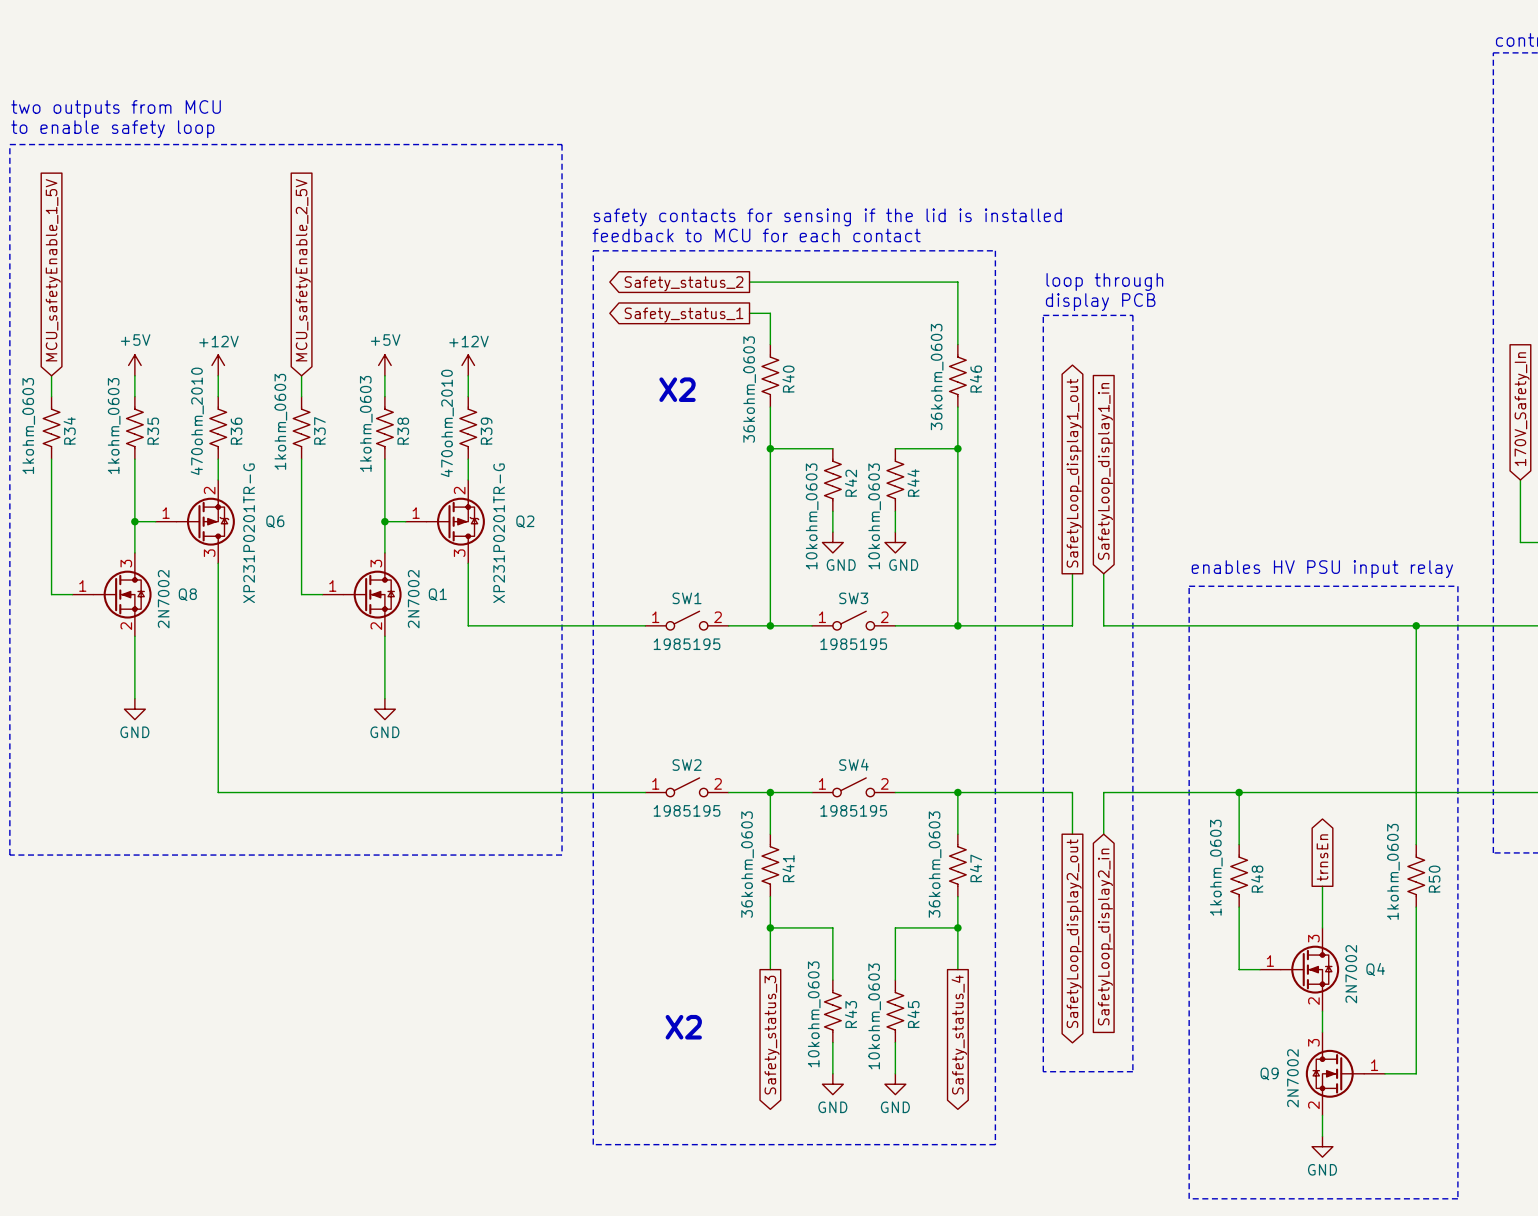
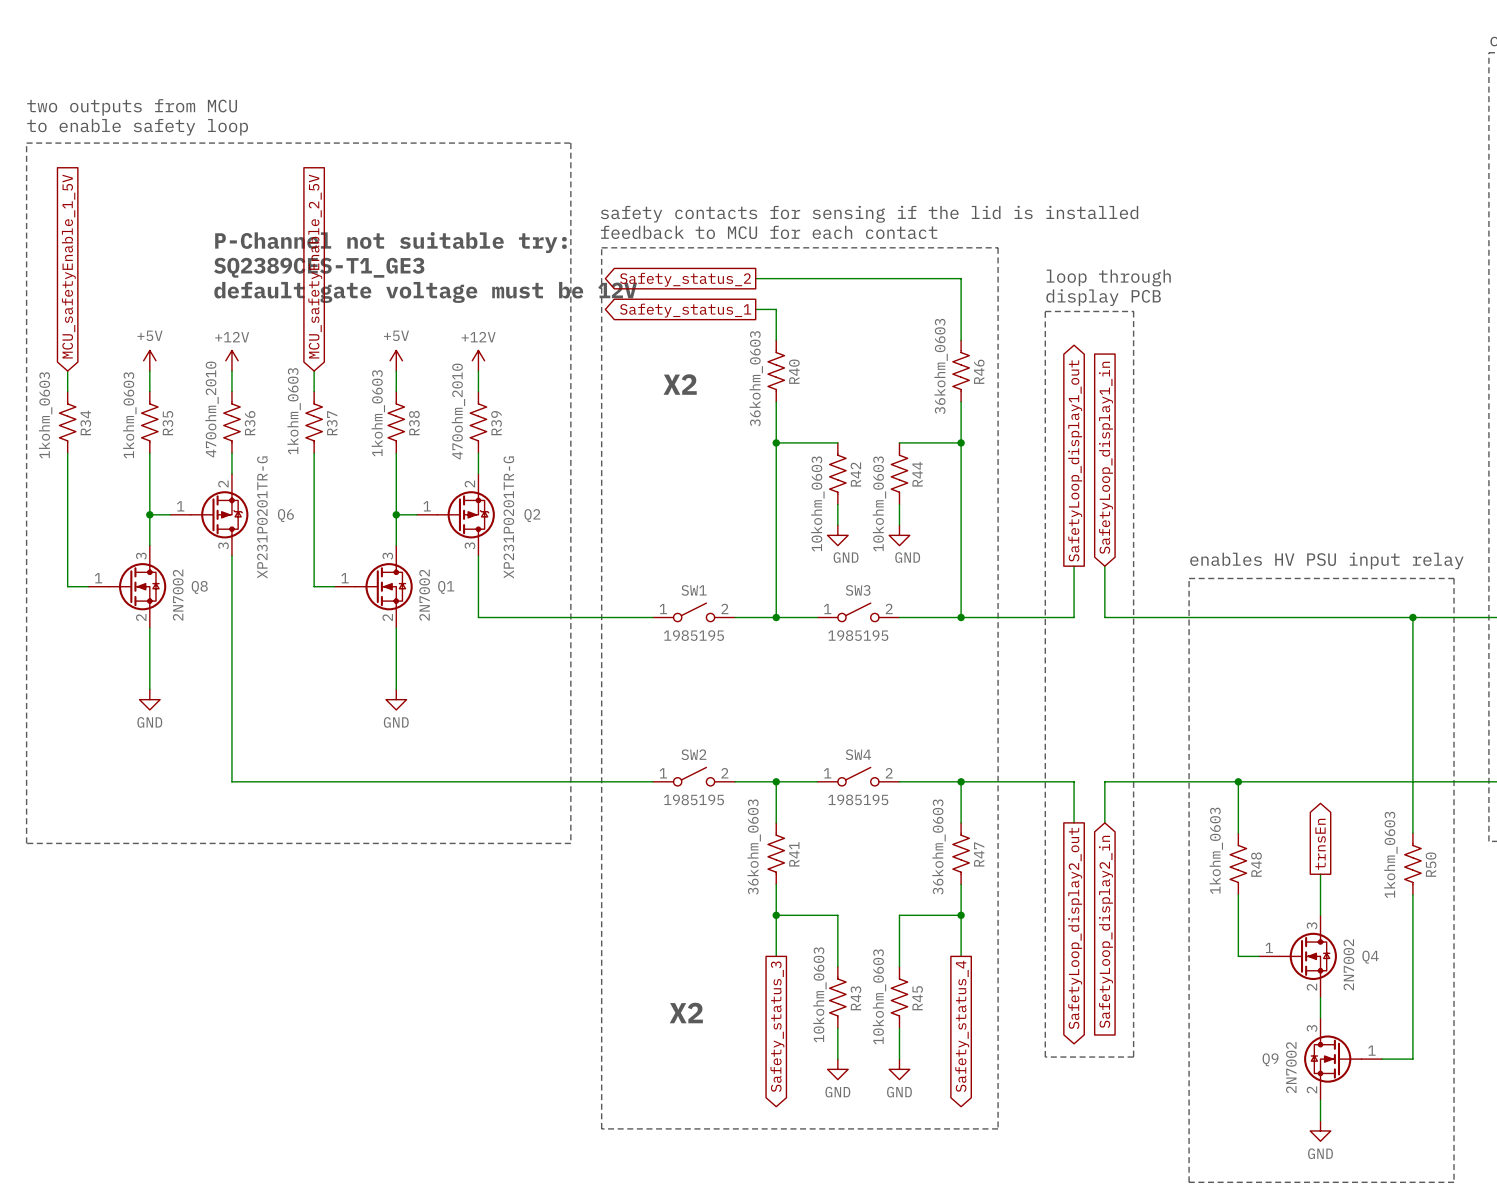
text: none -> P-Channel not suitable try: (390, 242)
text: none -> SQ2389CES-T1_GE3 (319, 267)
text: none -> default gate voltage must be 12V (425, 292)

